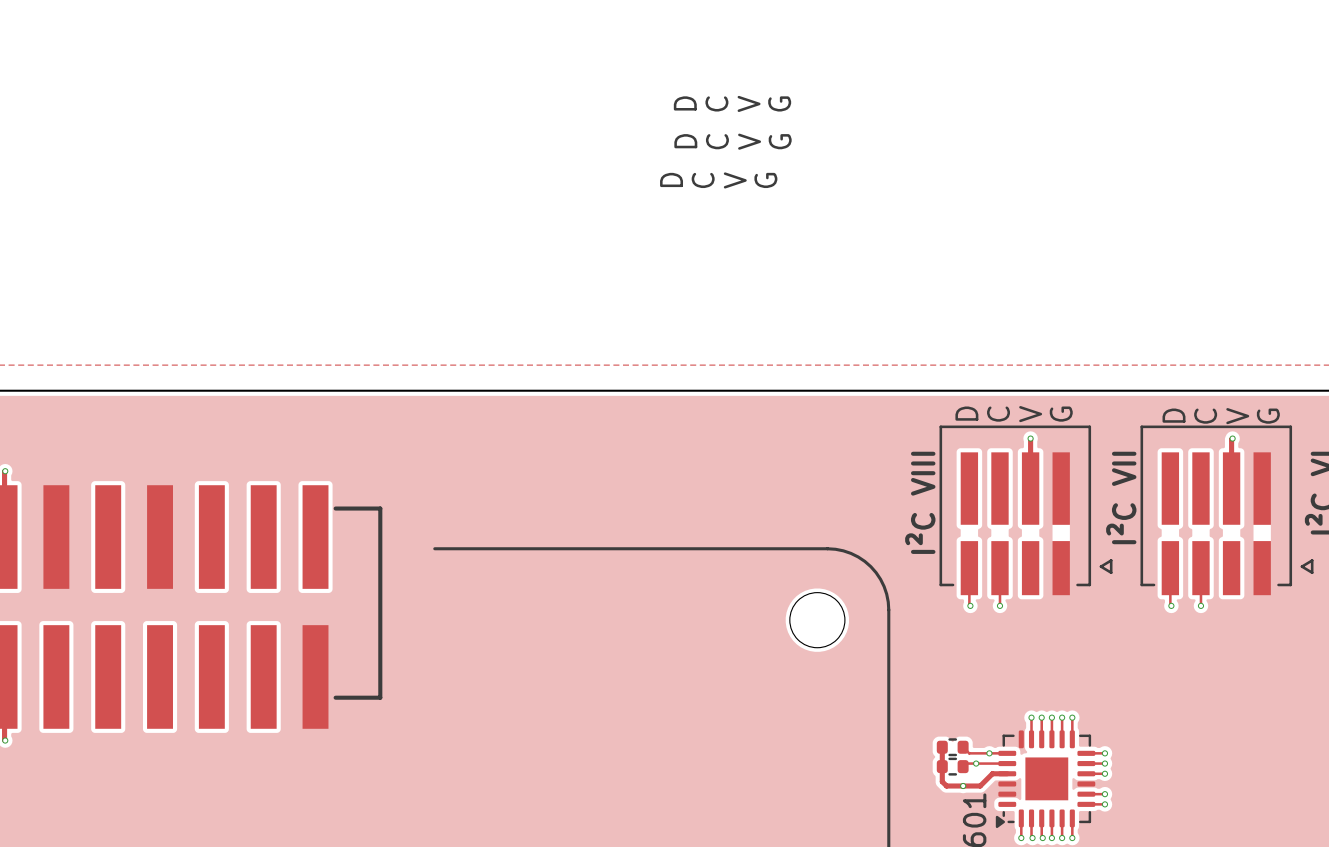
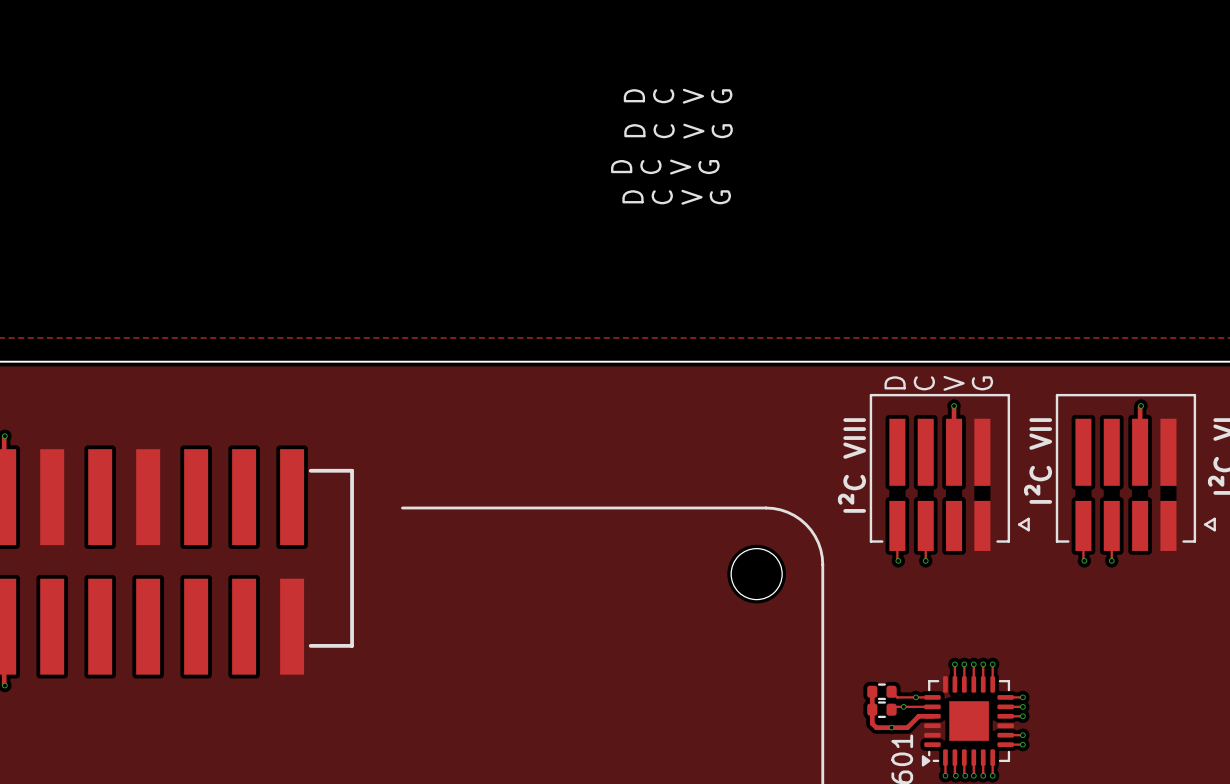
text: none -> D (632, 196)
text: none -> C (662, 197)
text: none -> V (692, 197)
text: none -> G (720, 197)
text: D (1173, 415) -> none
text: C (1205, 416) -> none
text: V (1237, 416) -> none
text: G (1268, 416) -> none

